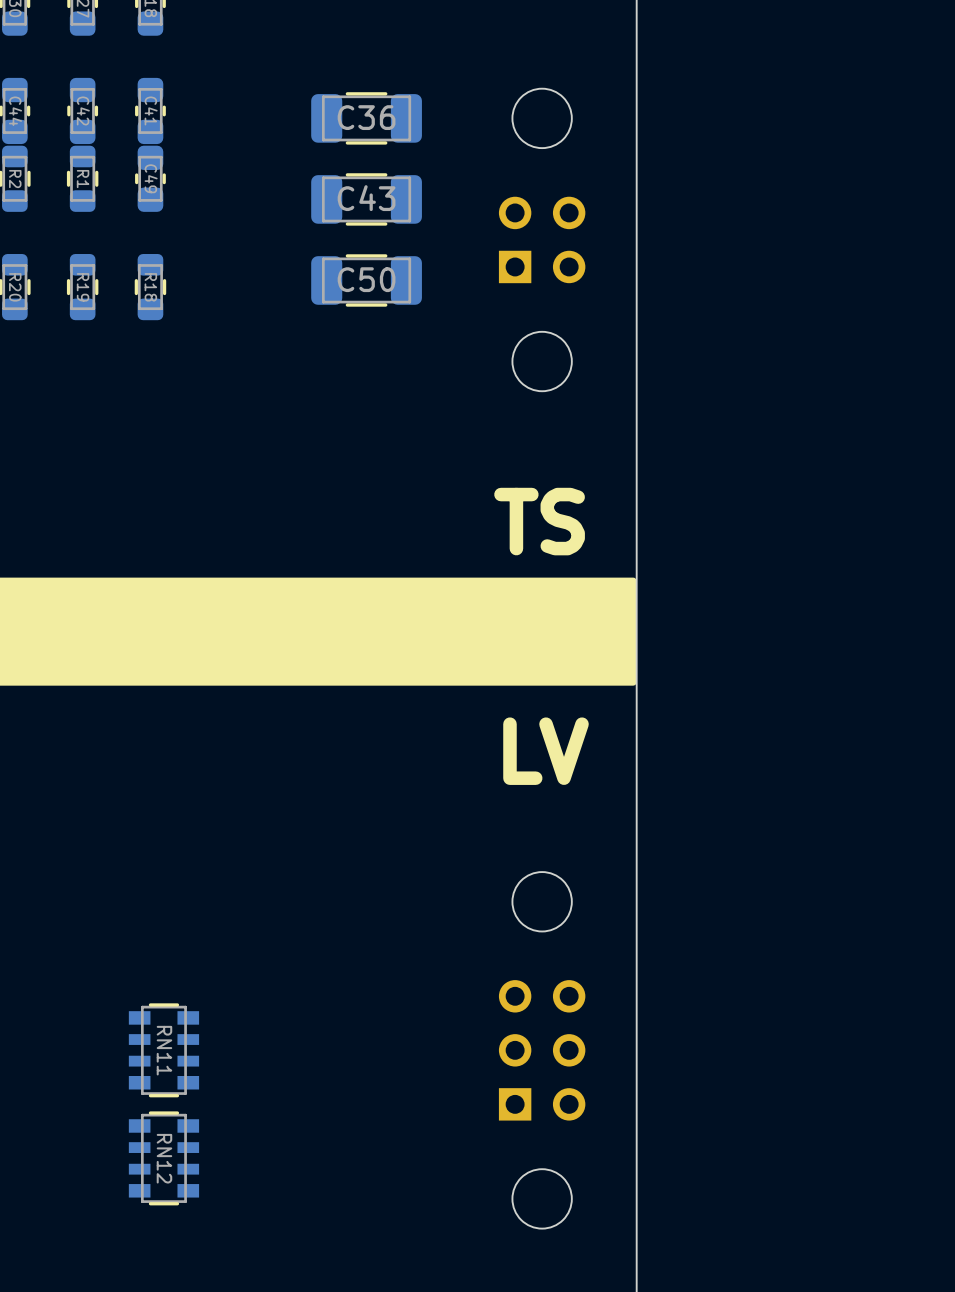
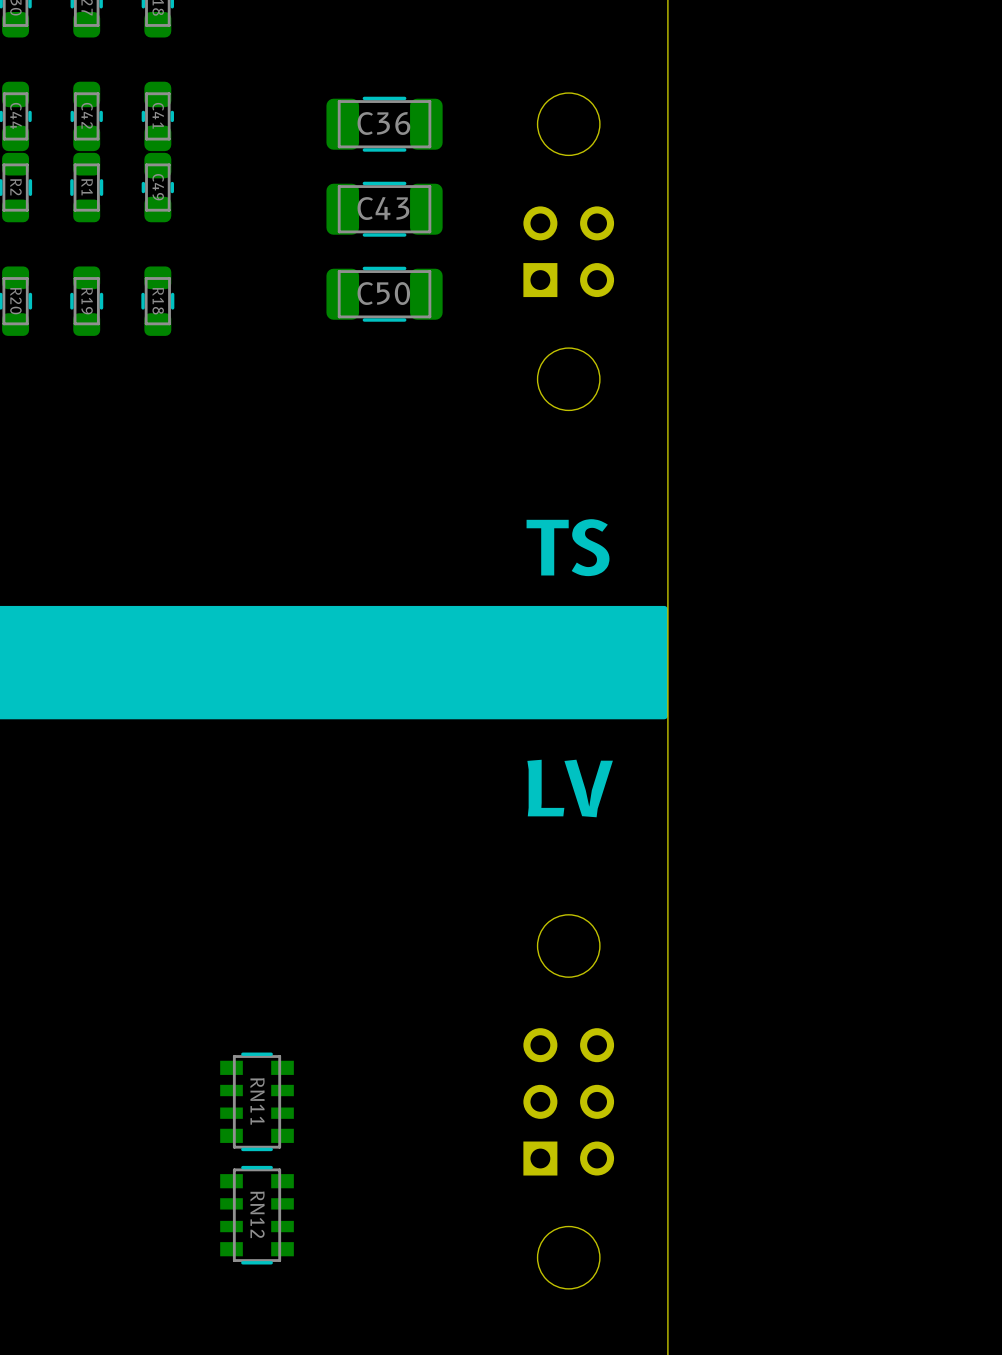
RN11 position: (163, 1050) -> (257, 1101)
RN12 position: (163, 1158) -> (257, 1215)

